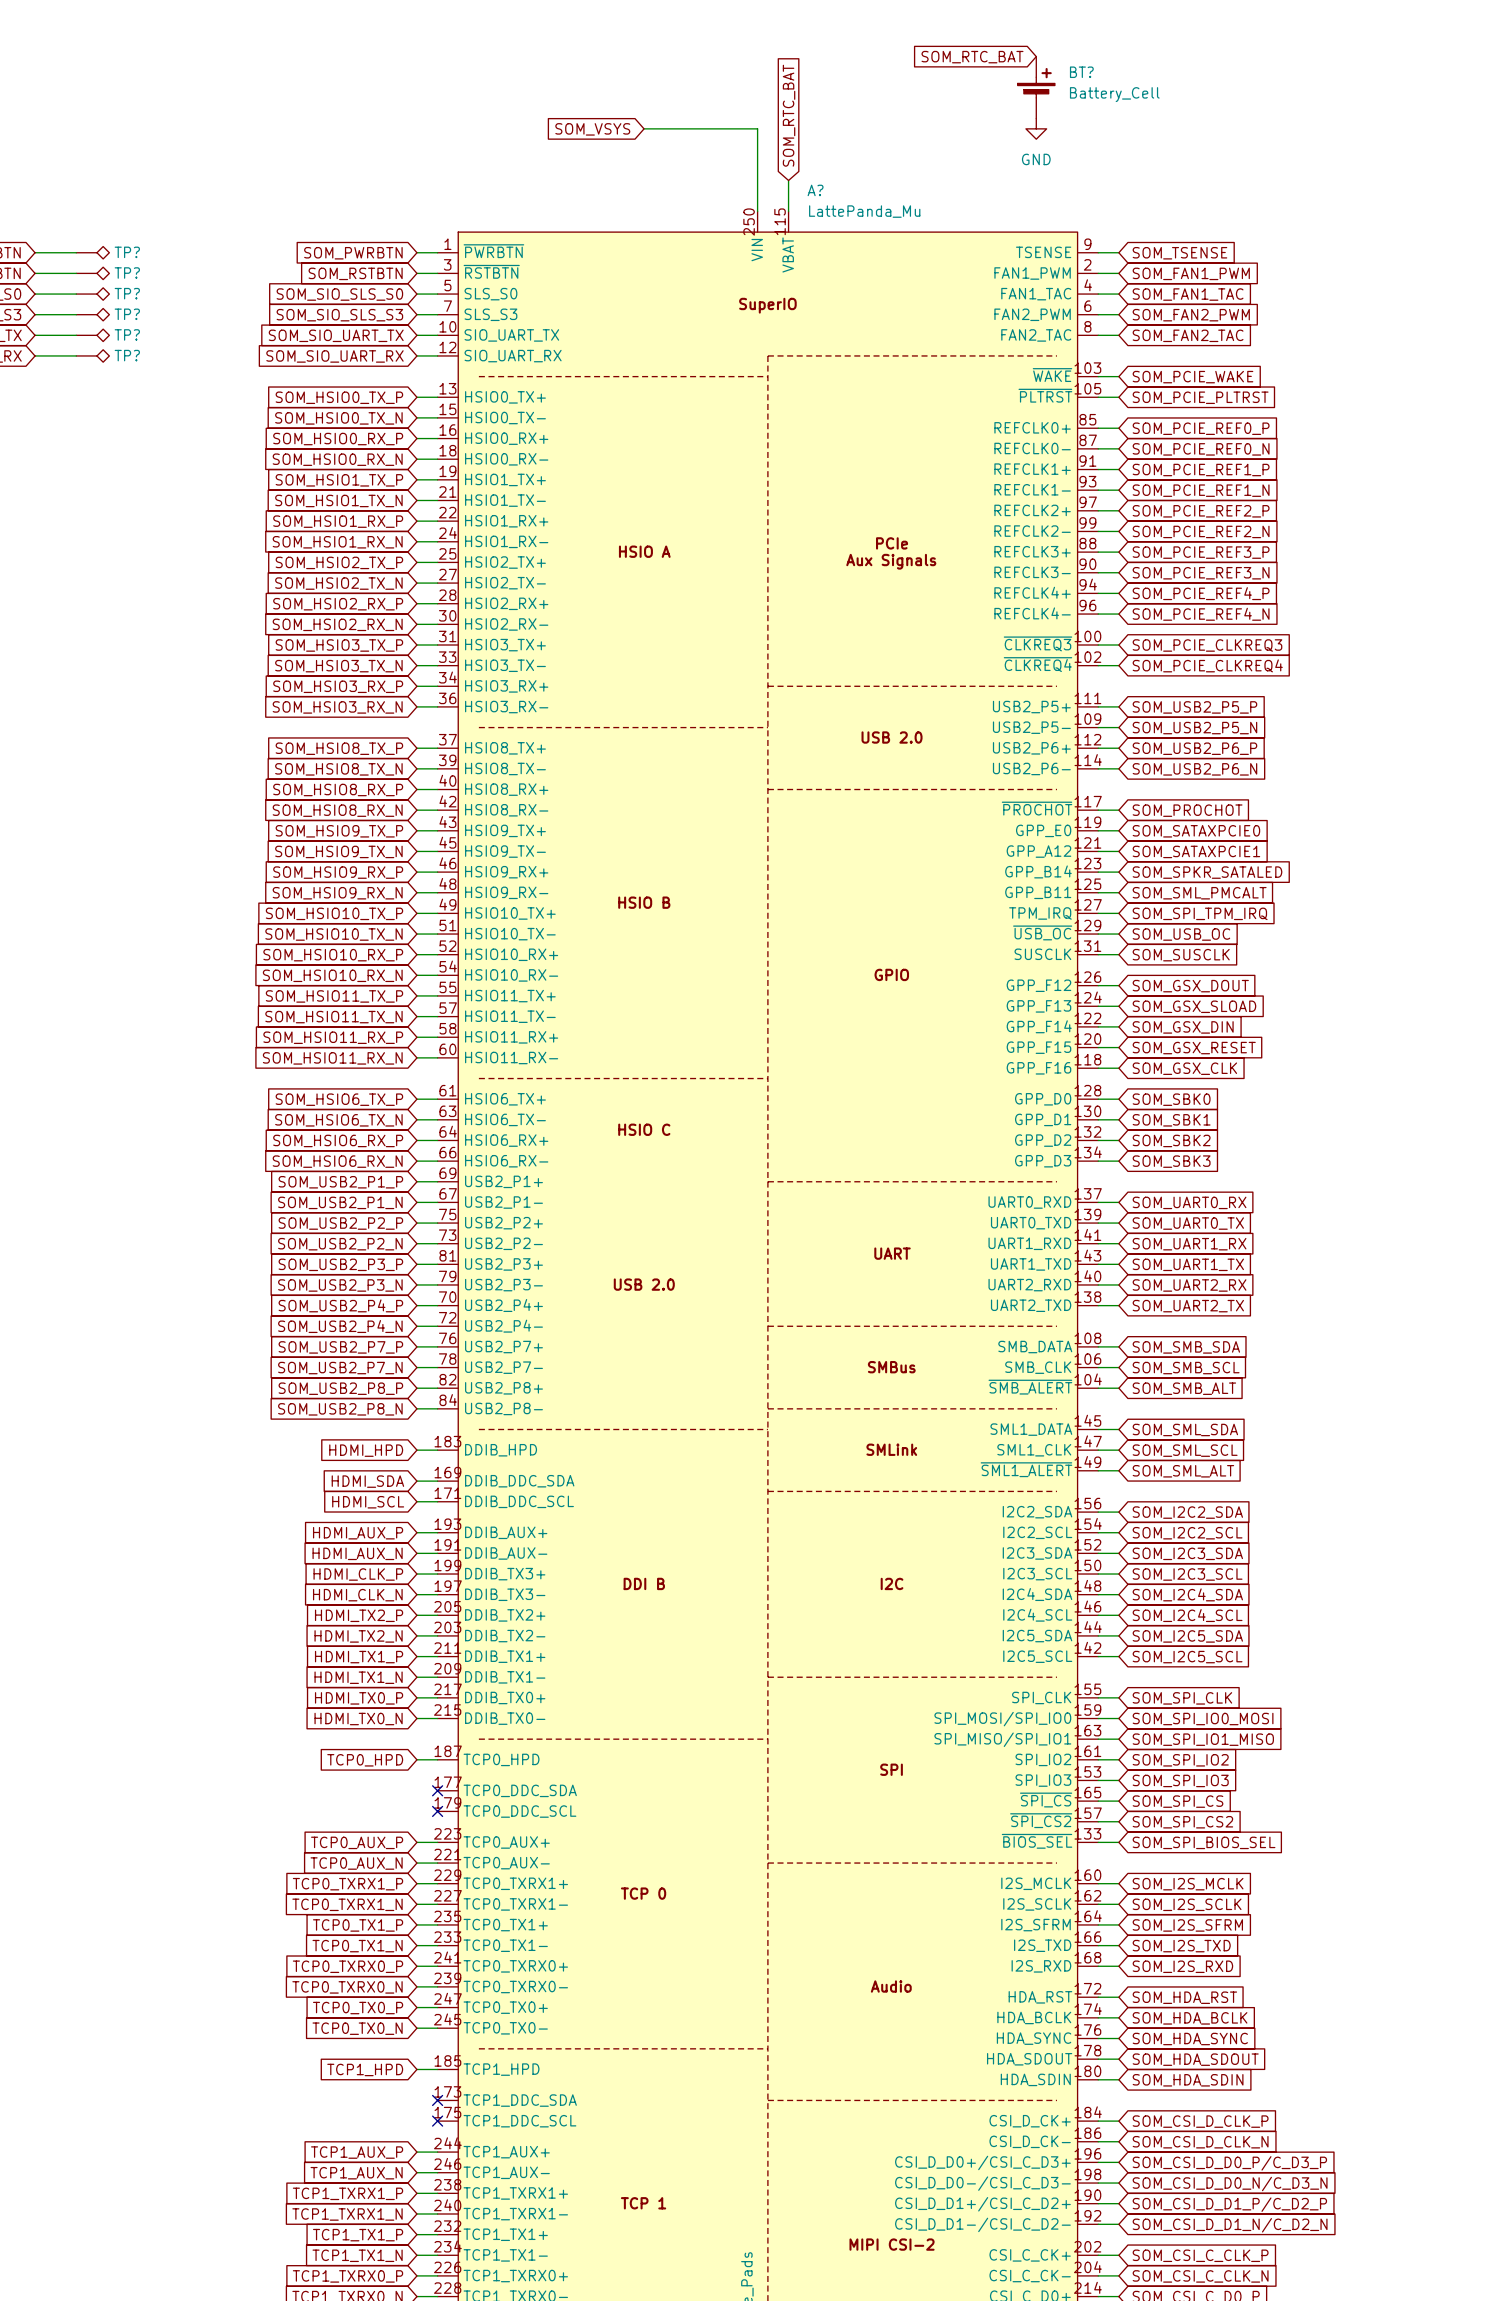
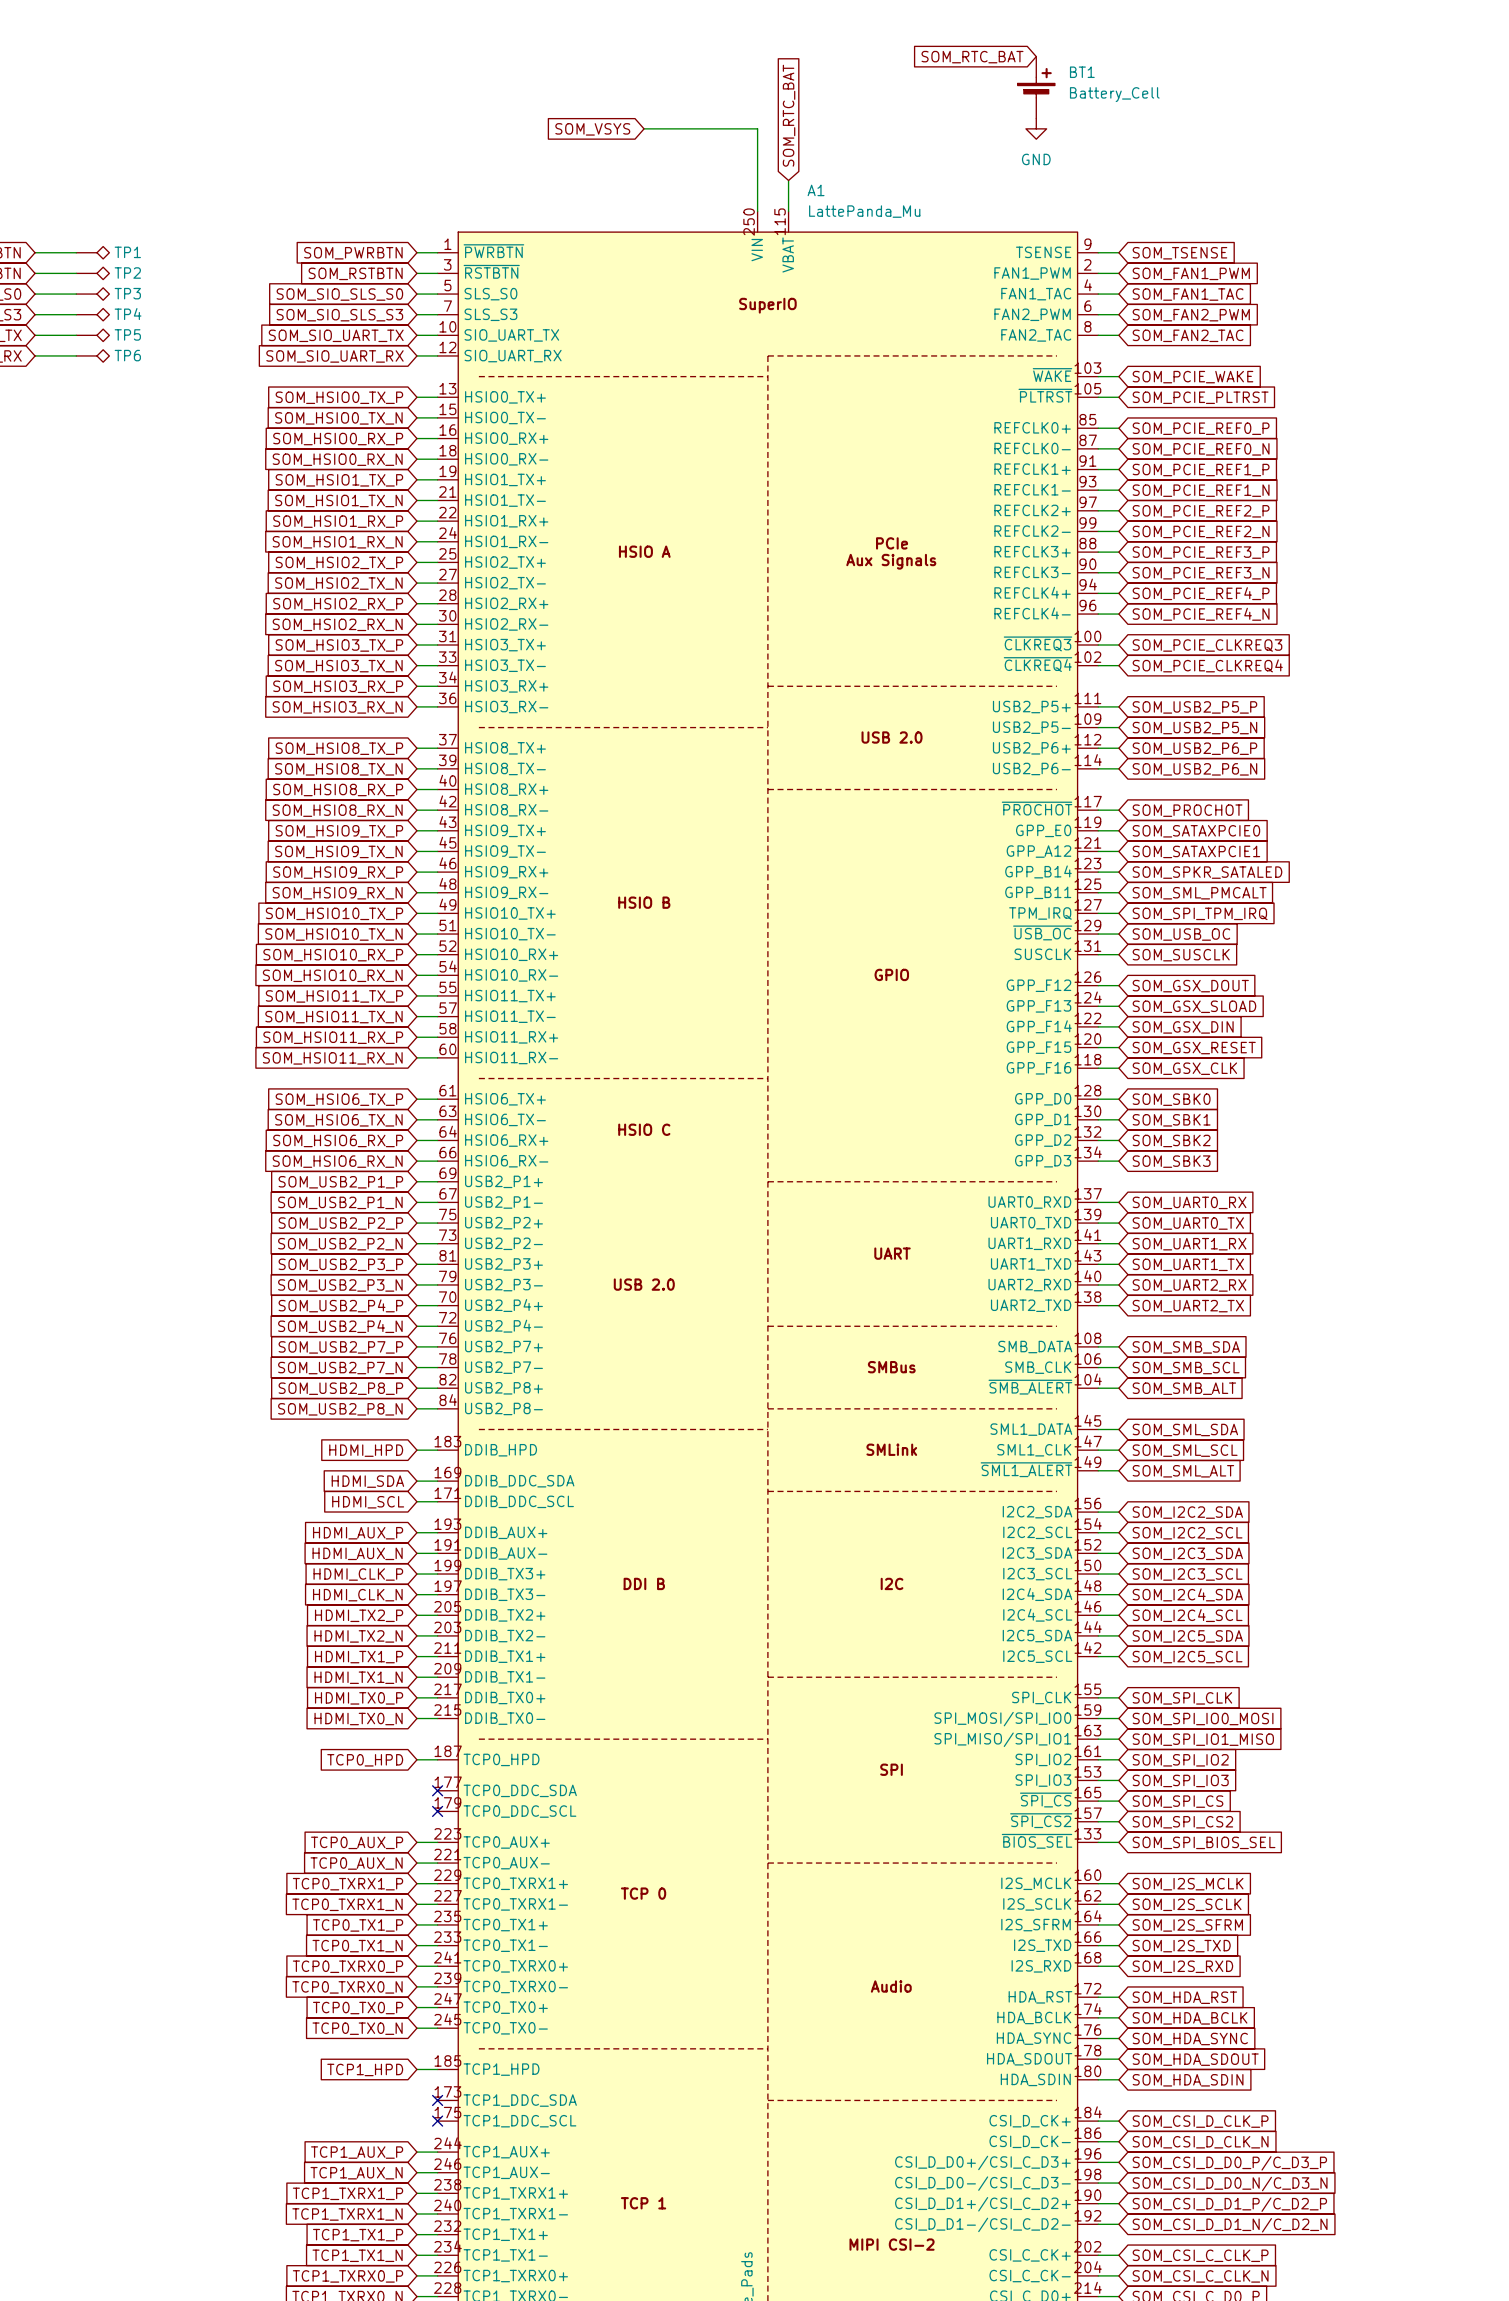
BT? name: BT? (1081, 72) -> BT1 (1082, 72)
A? name: A? (815, 190) -> A1 (816, 190)
TP? name: TP? (127, 252) -> TP1 (127, 252)
TP? name: TP? (127, 273) -> TP2 (127, 273)
TP? name: TP? (127, 293) -> TP3 (127, 293)
TP? name: TP? (127, 314) -> TP4 (128, 314)
TP? name: TP? (127, 334) -> TP5 (127, 334)
TP? name: TP? (127, 355) -> TP6 (127, 355)

